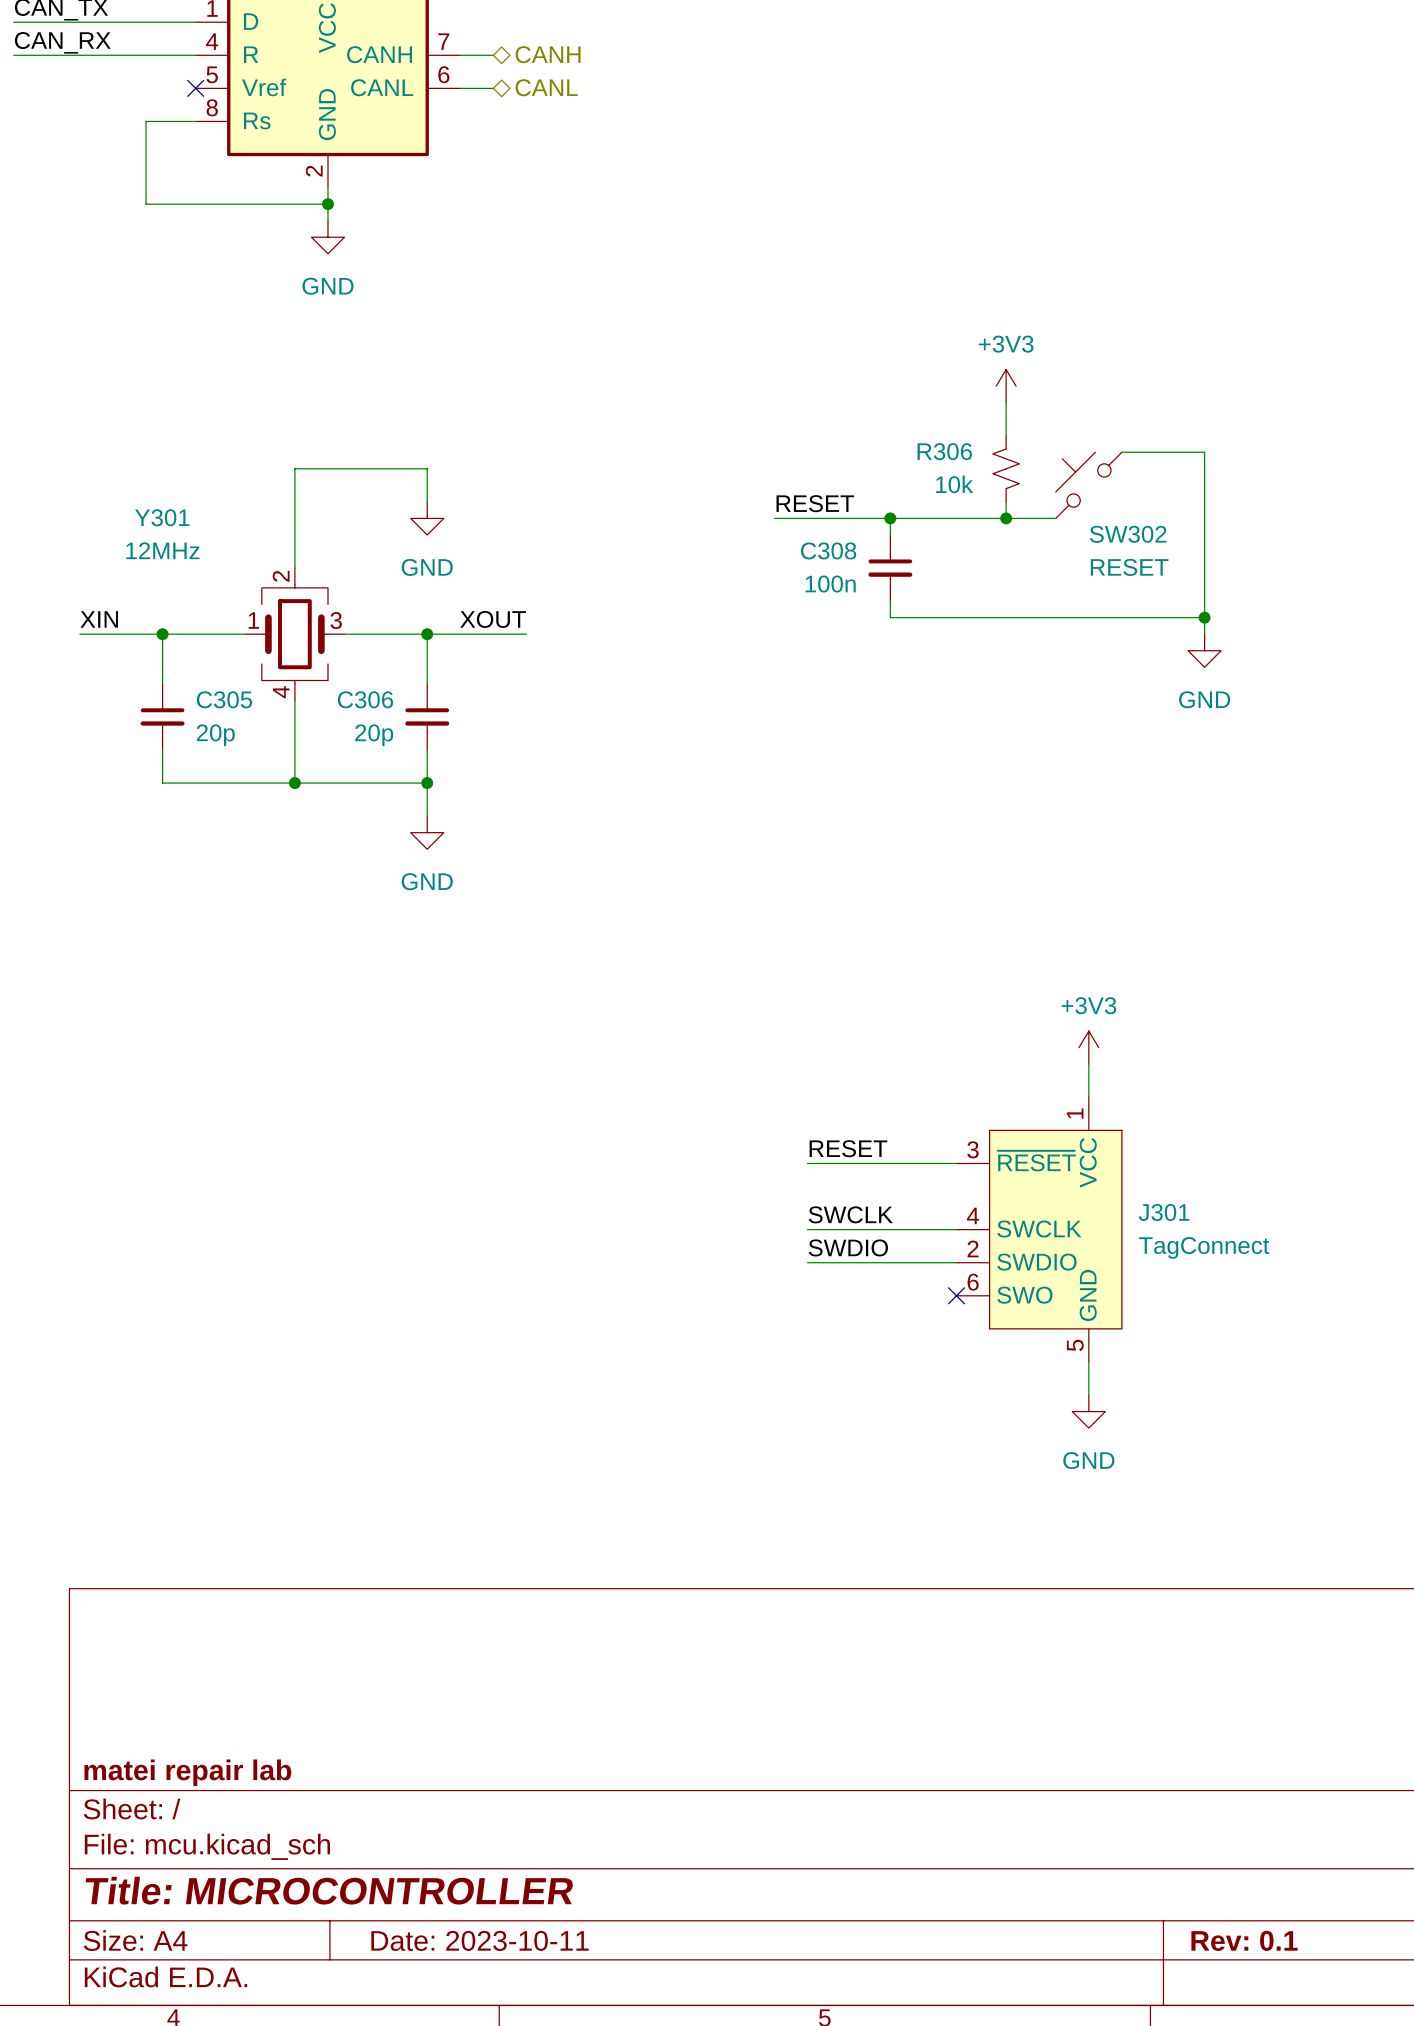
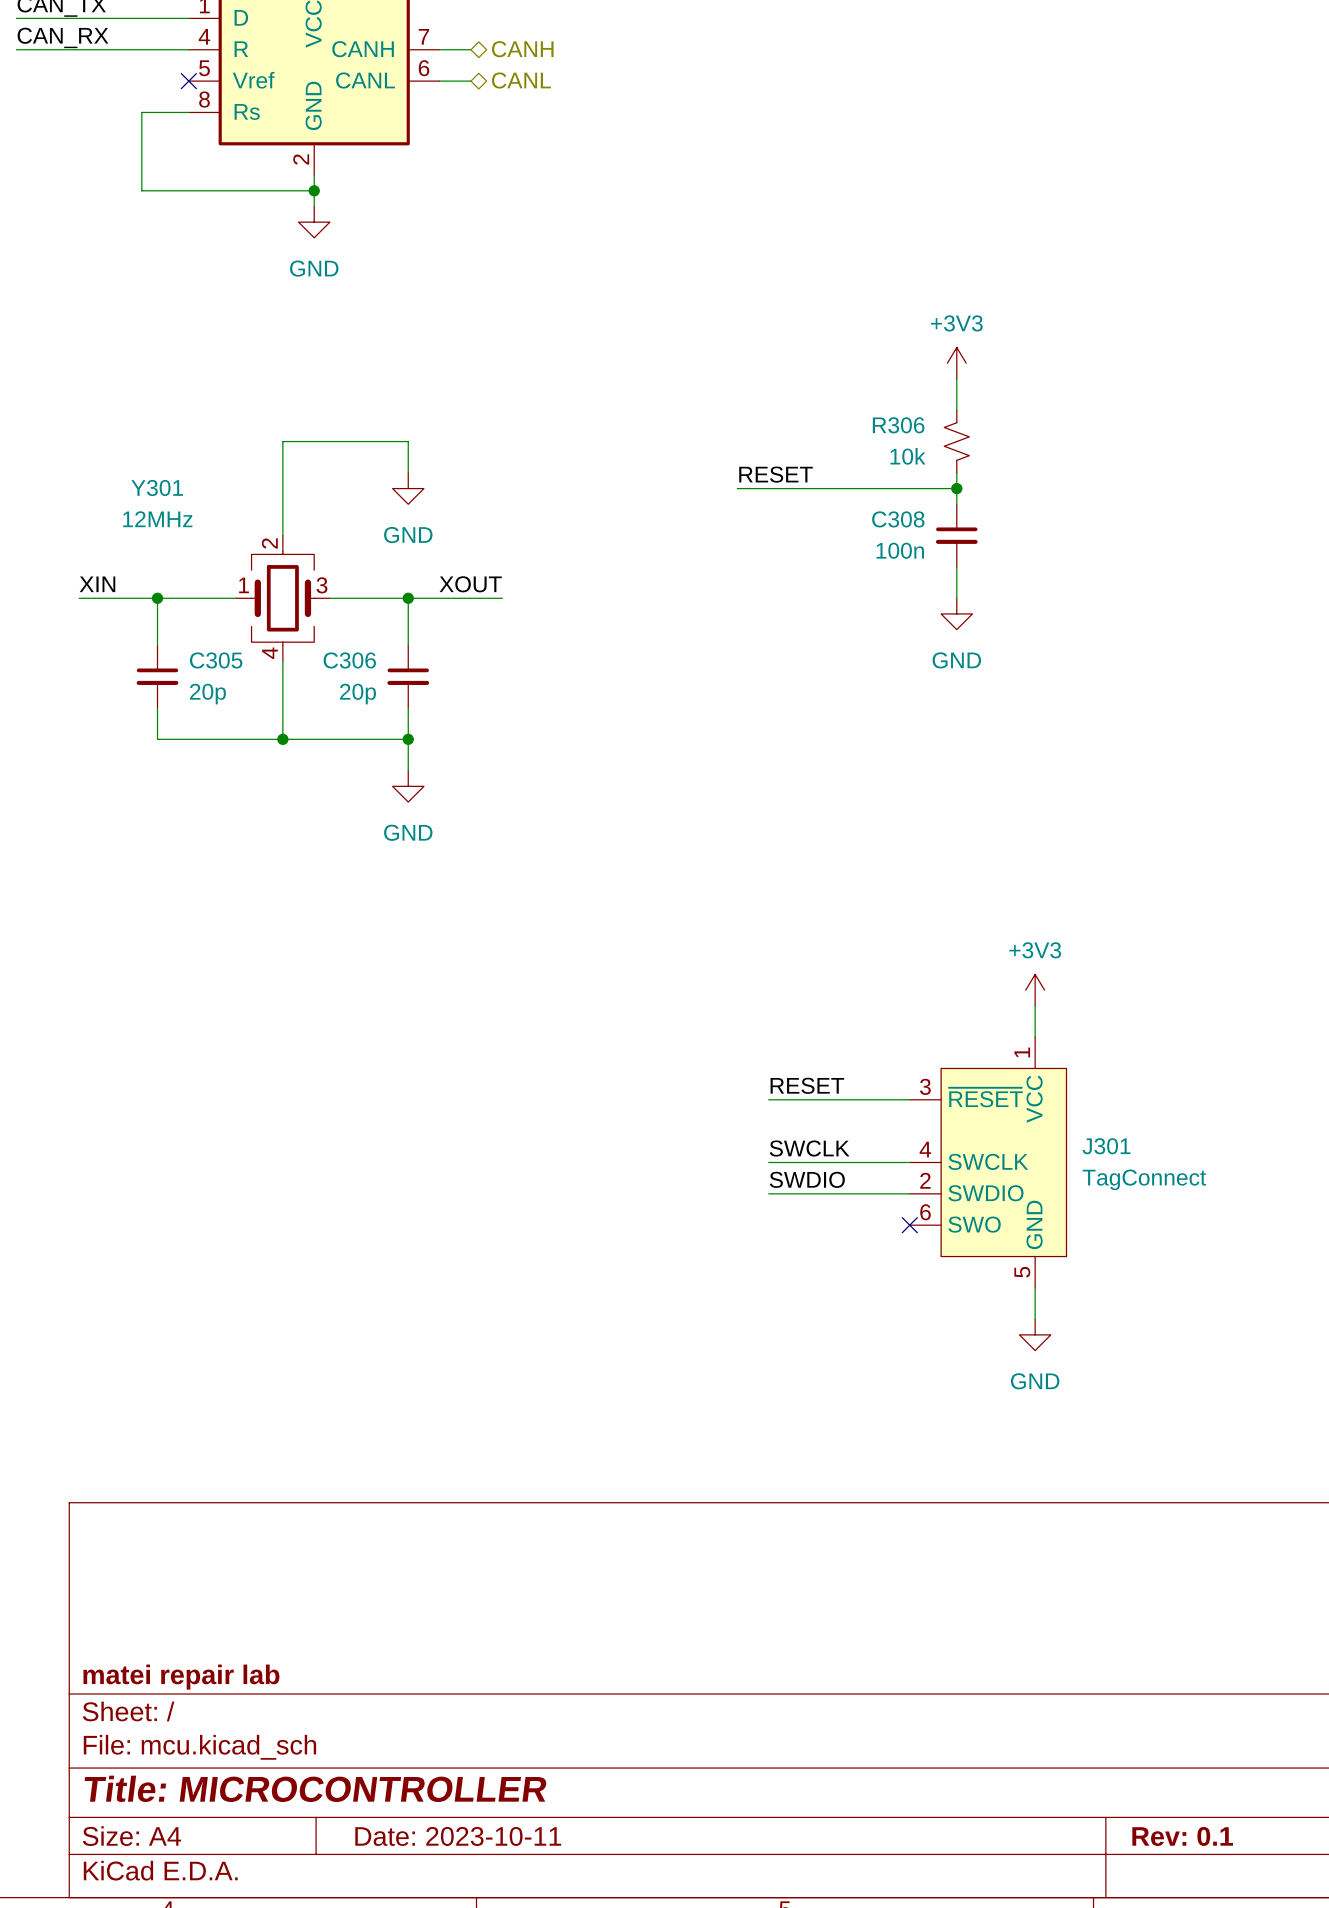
wire: (1121, 452) (1204, 452) (1204, 634) -> none
SW302: RESET (1088, 485) -> none
wire: (890, 518) (890, 534) -> none
junction: (890, 518) -> none
wire: (1006, 518) (1055, 518) -> (956, 488) (956, 504)
C308 position: (890, 568) -> (956, 535)
wire: (890, 601) (890, 617) (1204, 617) -> none
wire: none -> (956, 566) (956, 598)
junction: (1204, 617) -> none
power symbol position: GND (1204, 650) -> GND (956, 613)

